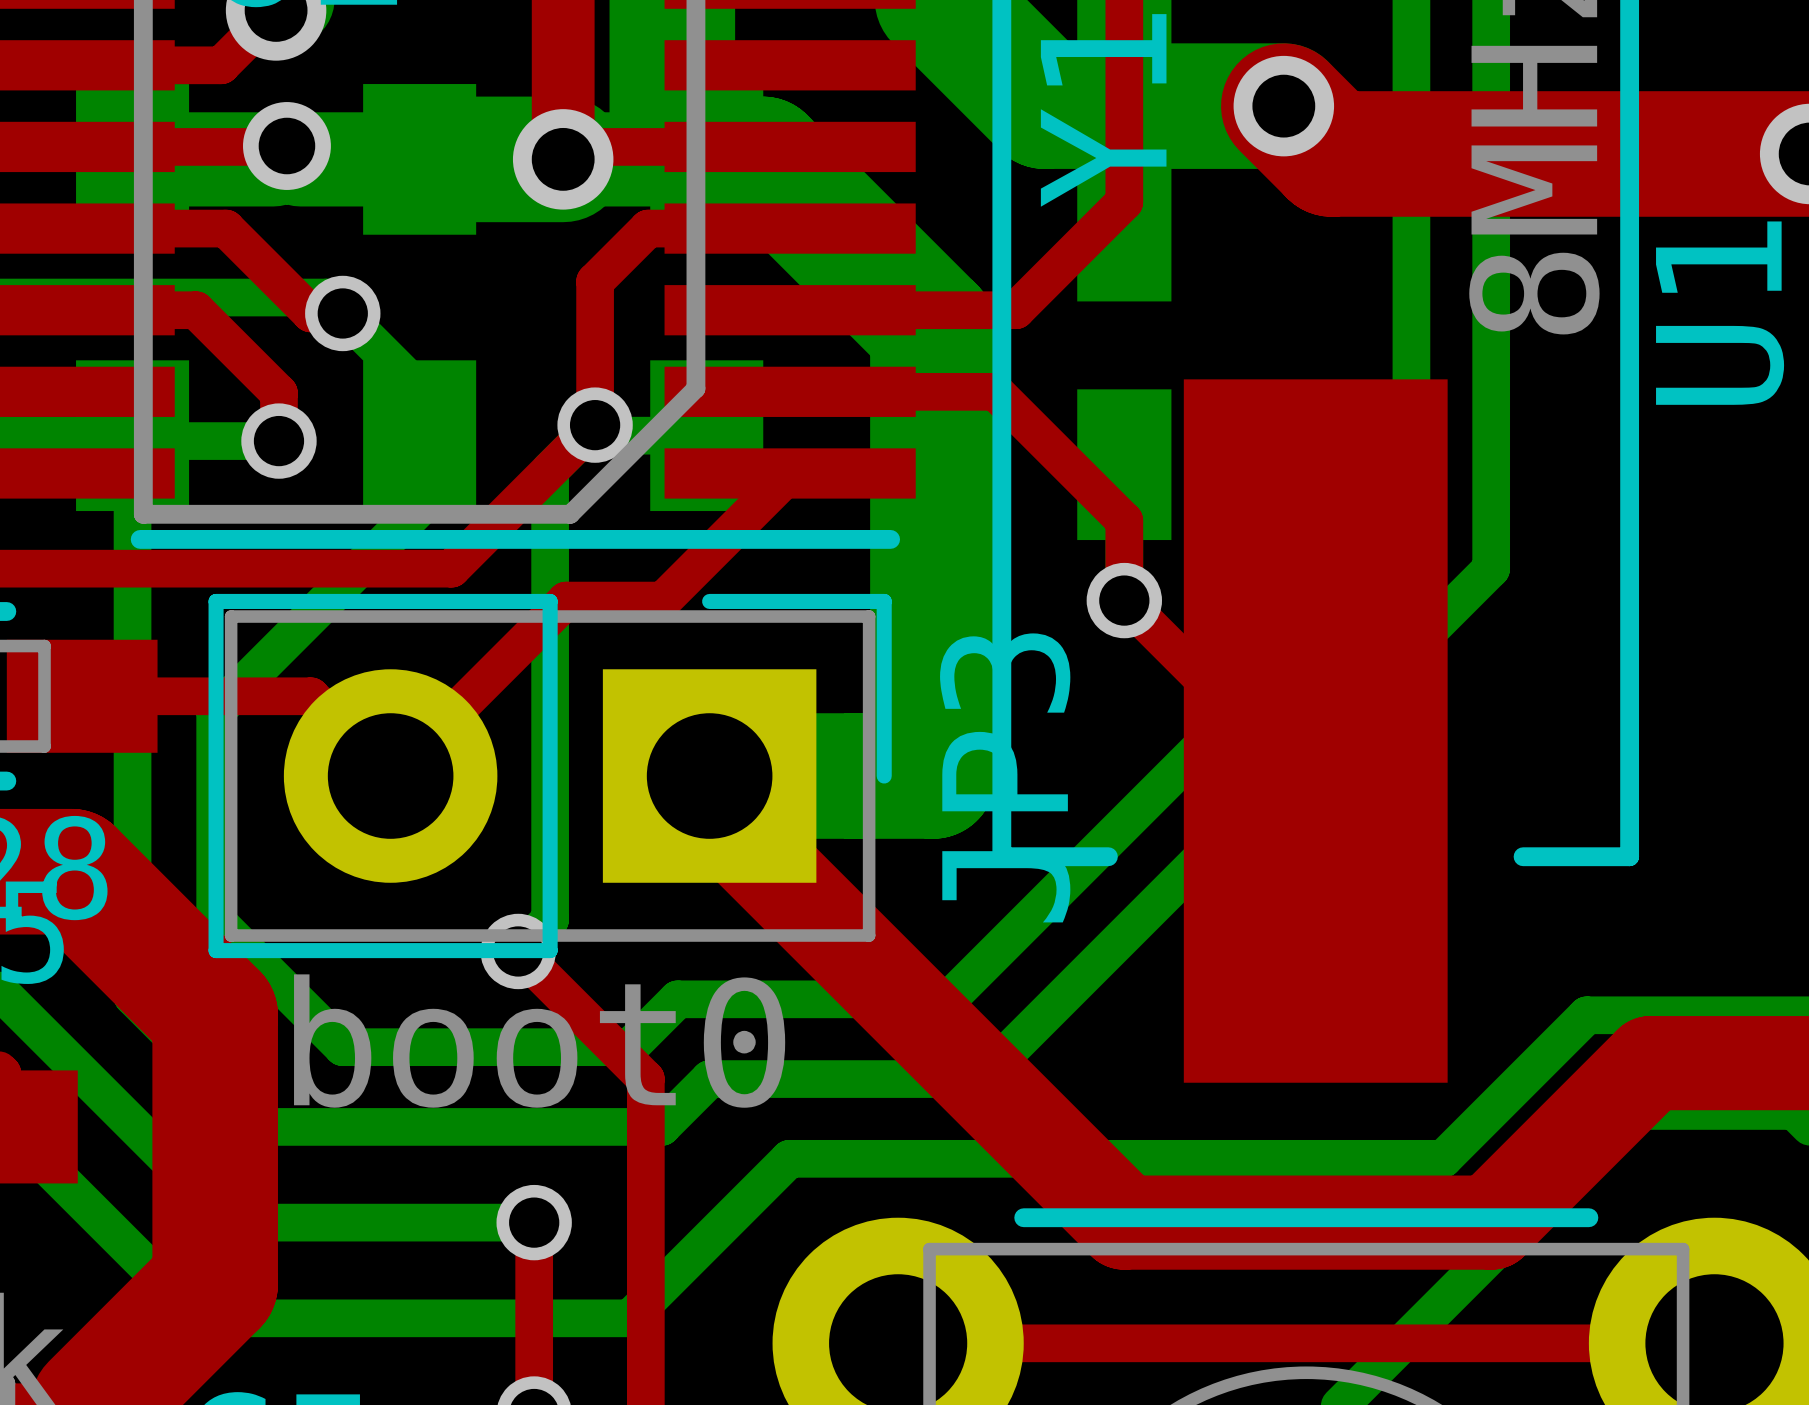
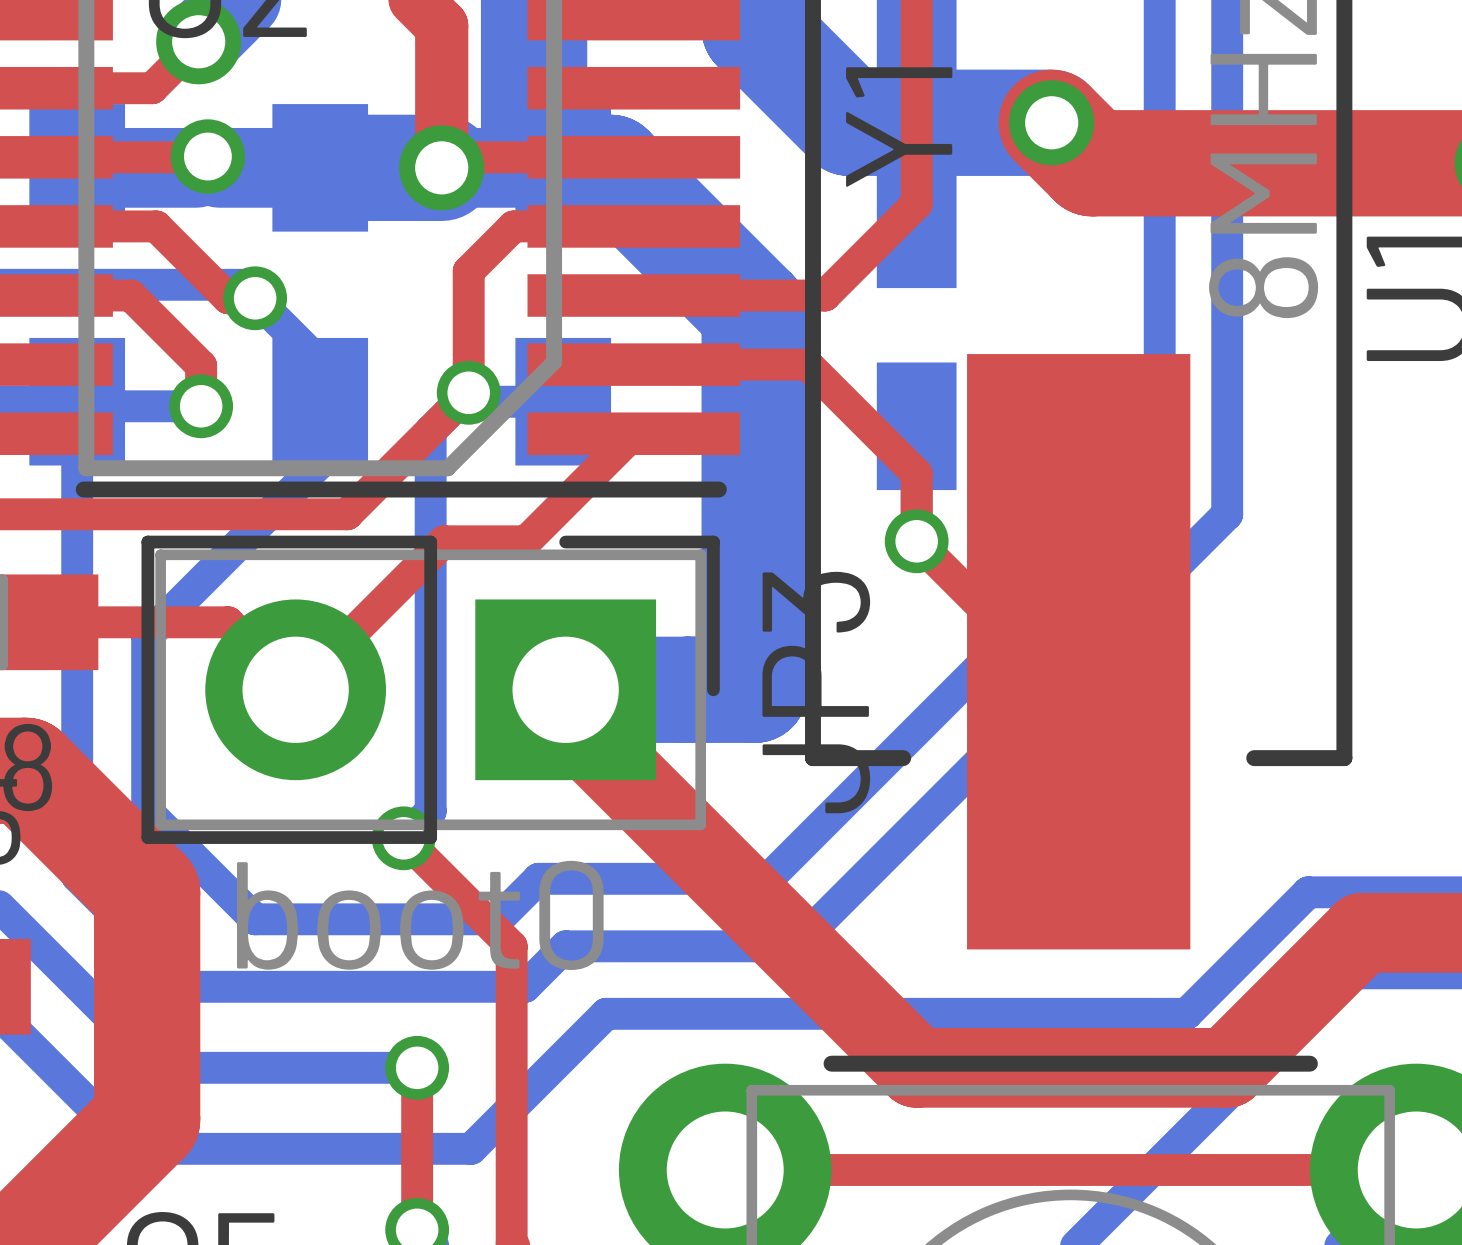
bottom track: (789, 1158) (629, 1318) (597, 1318) -> (633, 1013) (606, 1013) (471, 1148)

